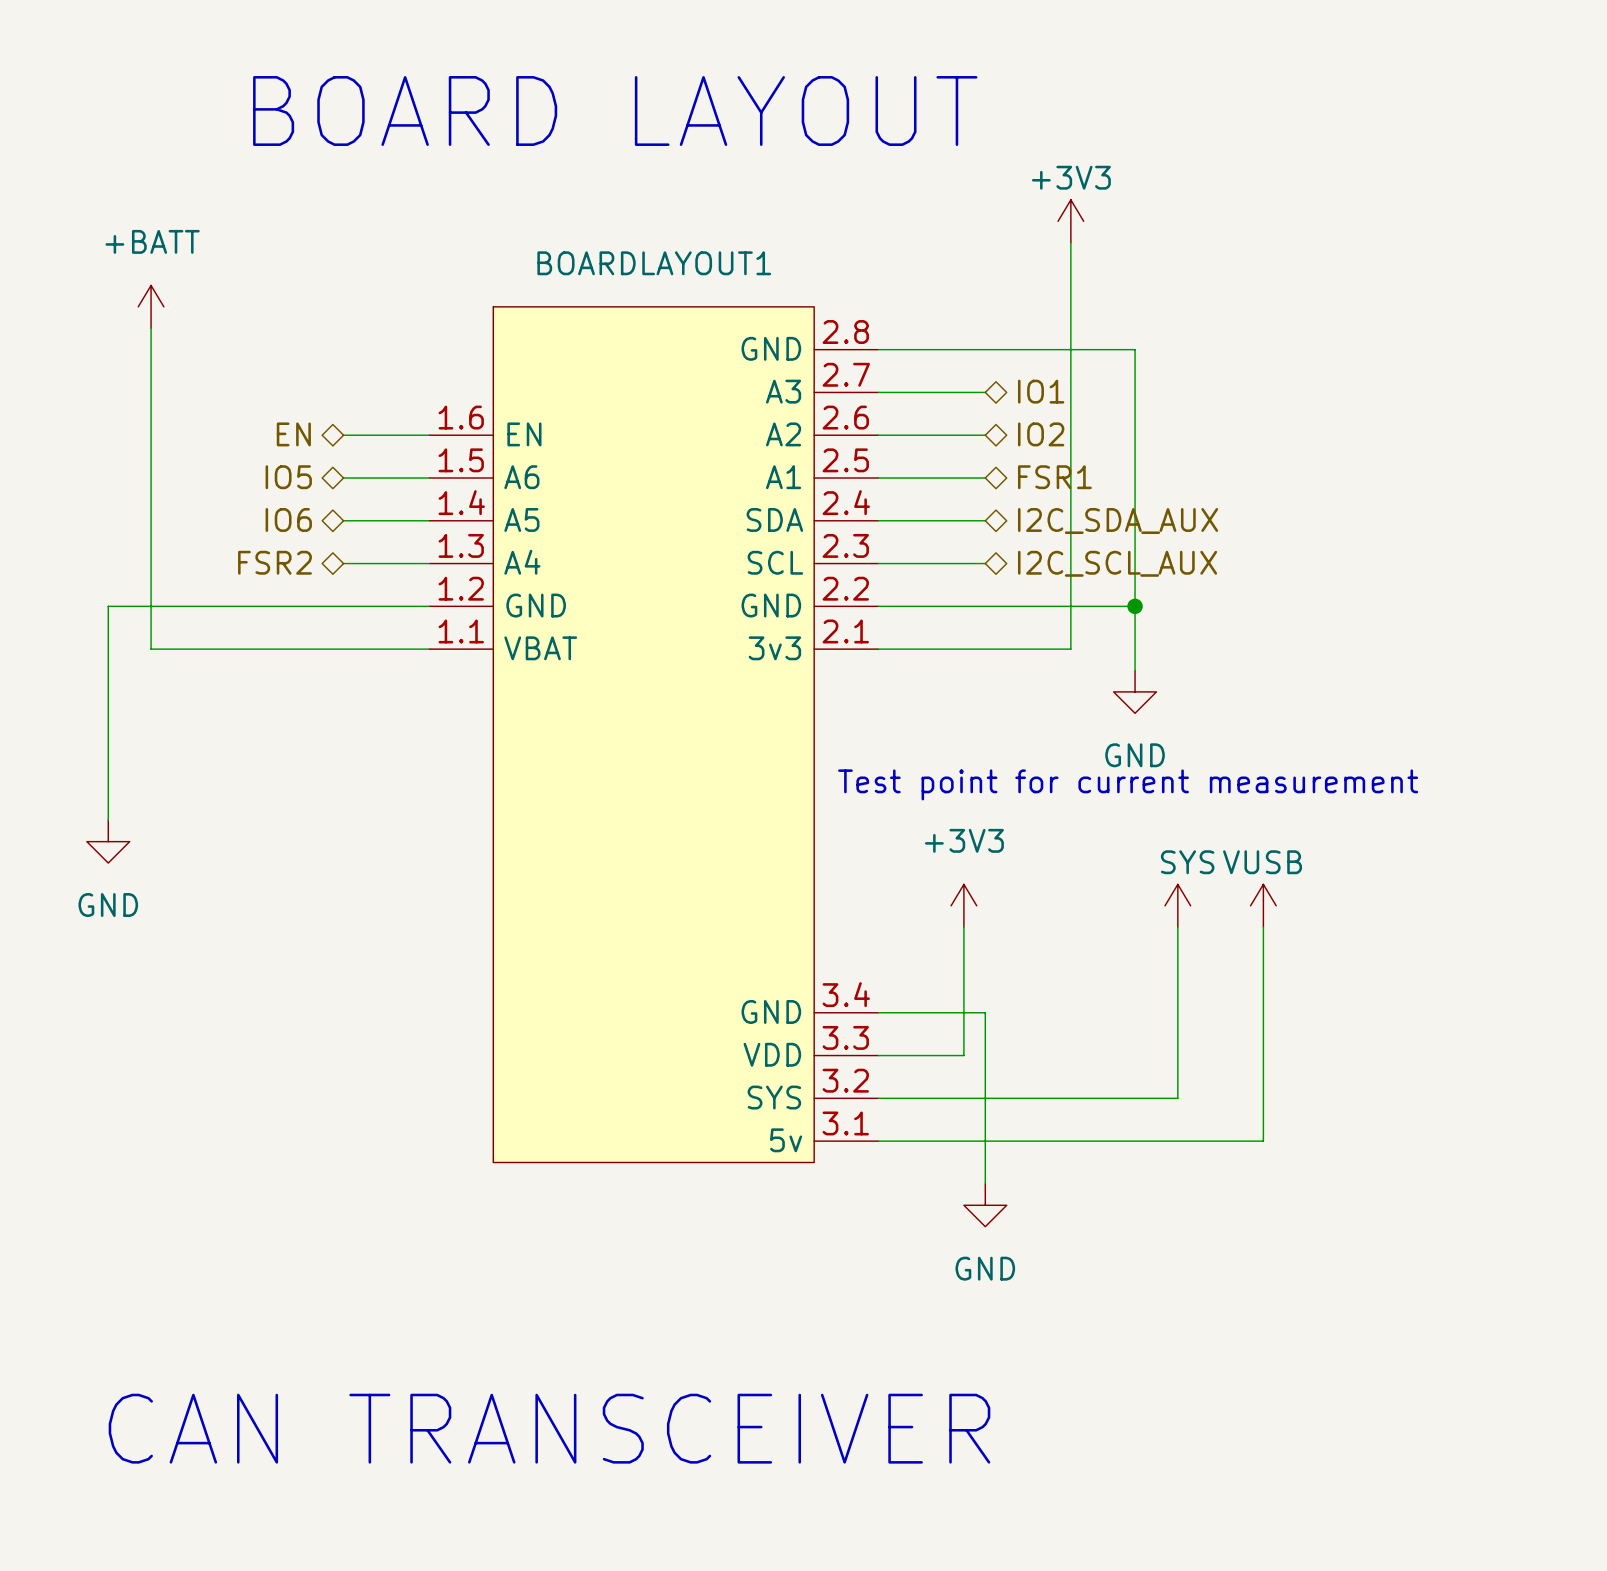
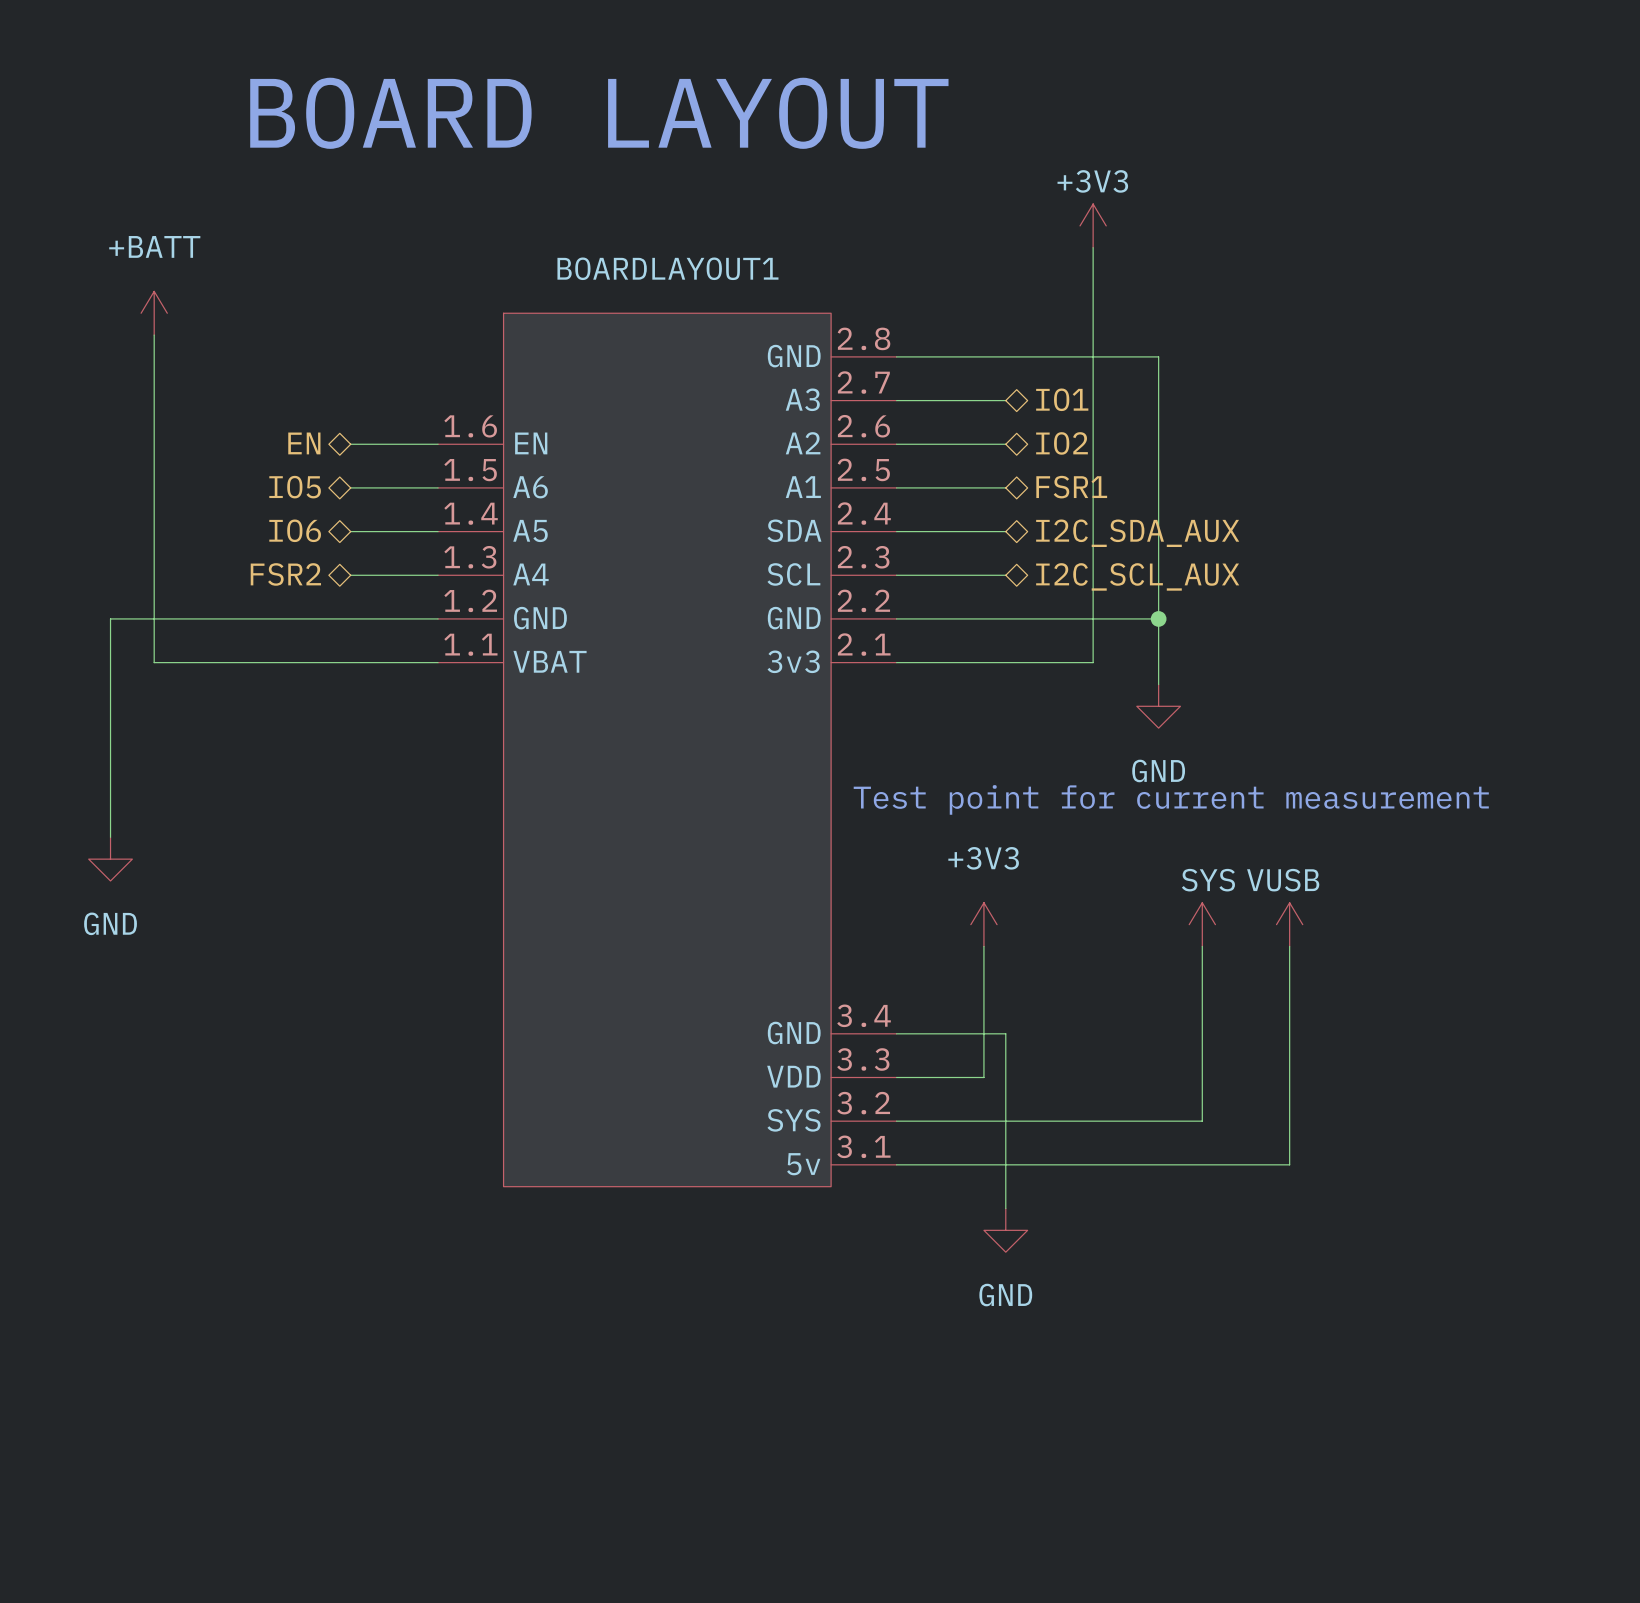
text: CAN TRANSCEIVER (549, 1428) -> none

